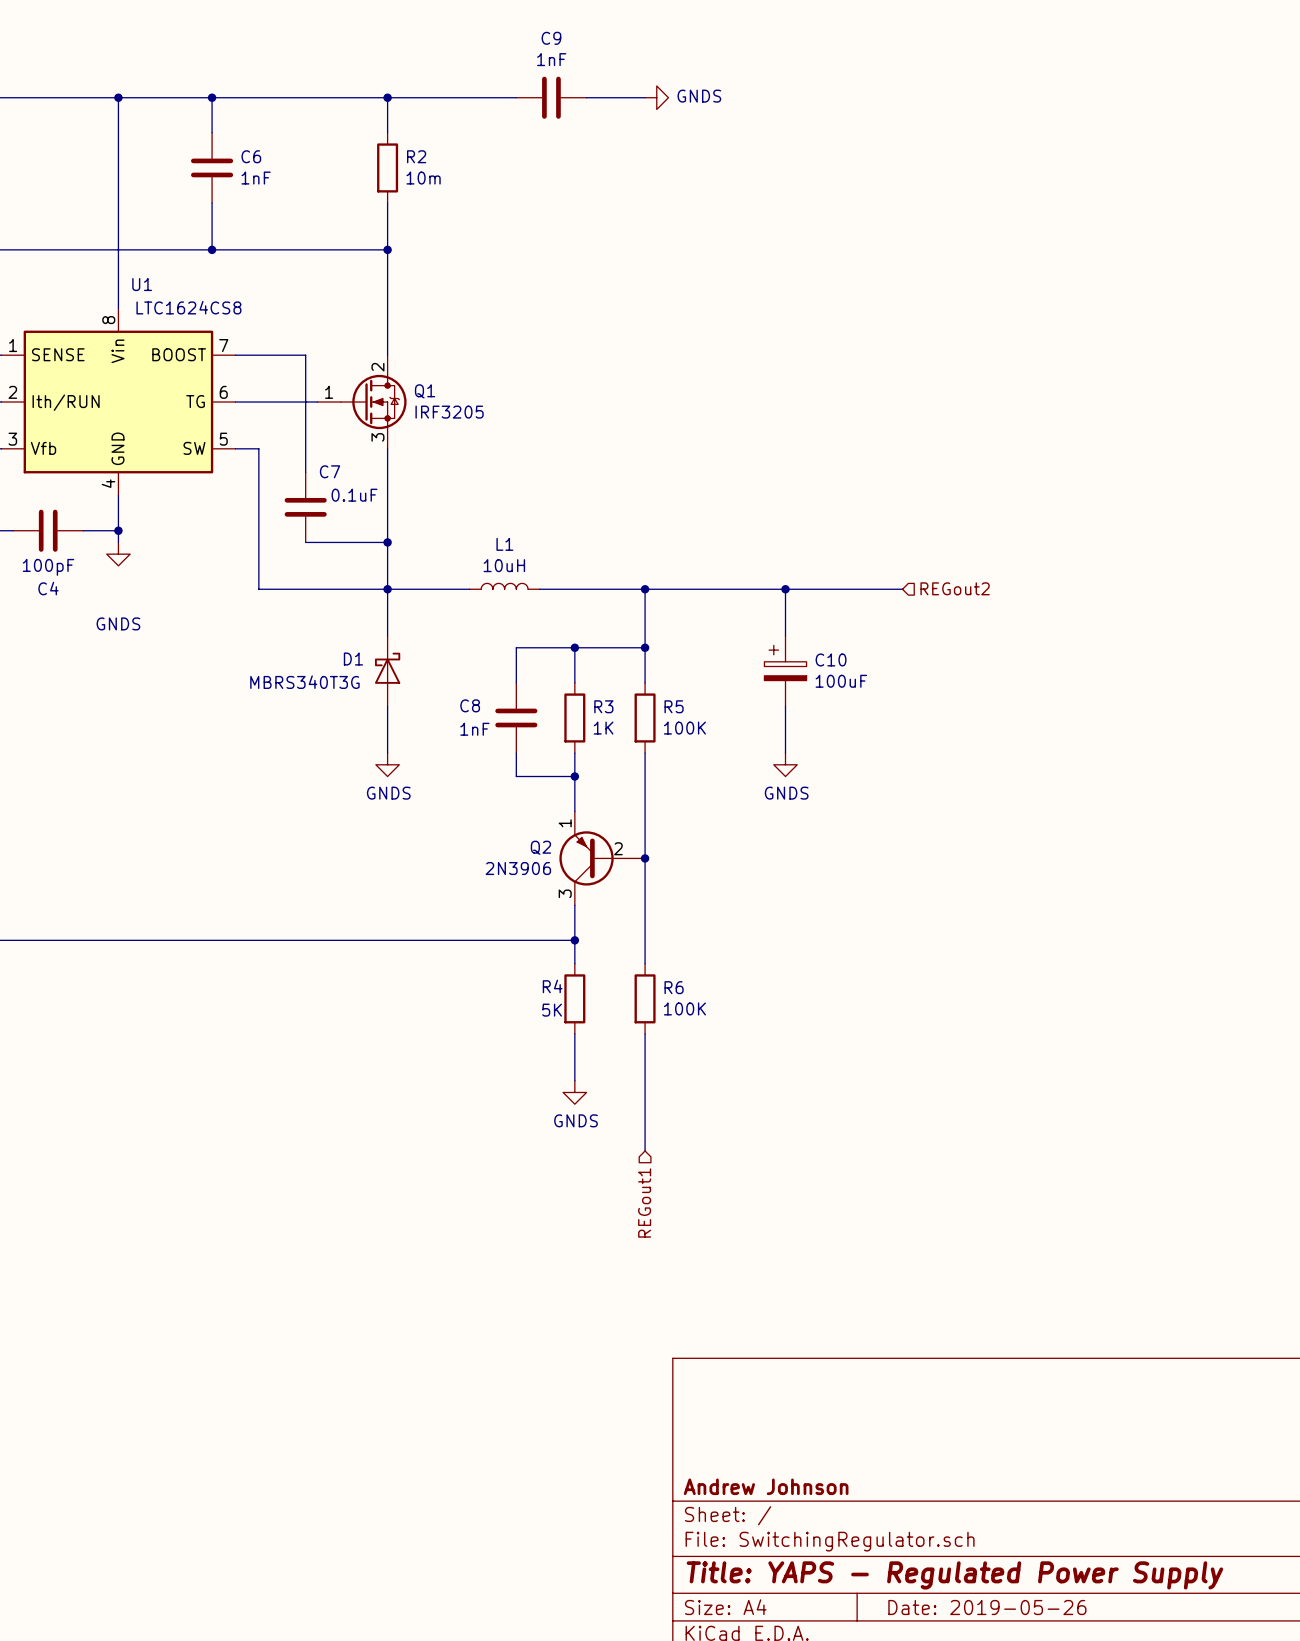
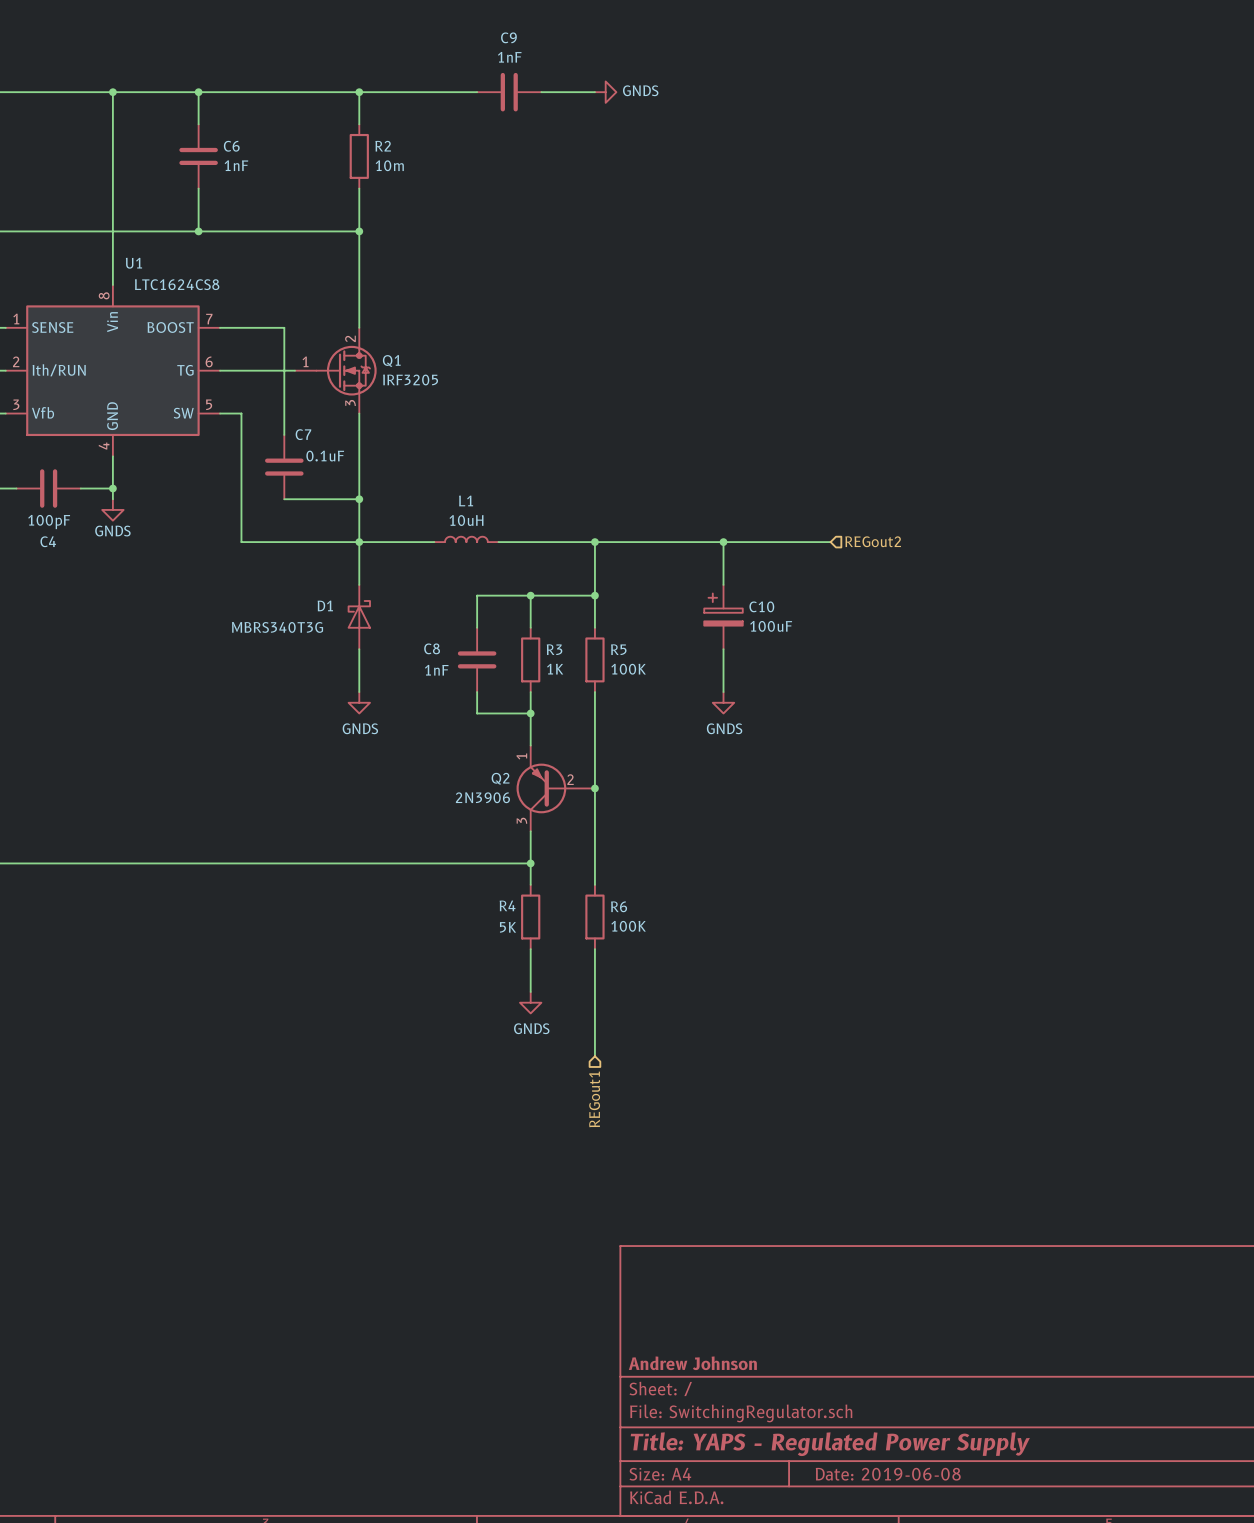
power symbol text position: GNDS (118, 623) -> GNDS (112, 531)
title block: Date: 2019-05-26 (987, 1607) -> Date: 2019-06-08 (888, 1474)

